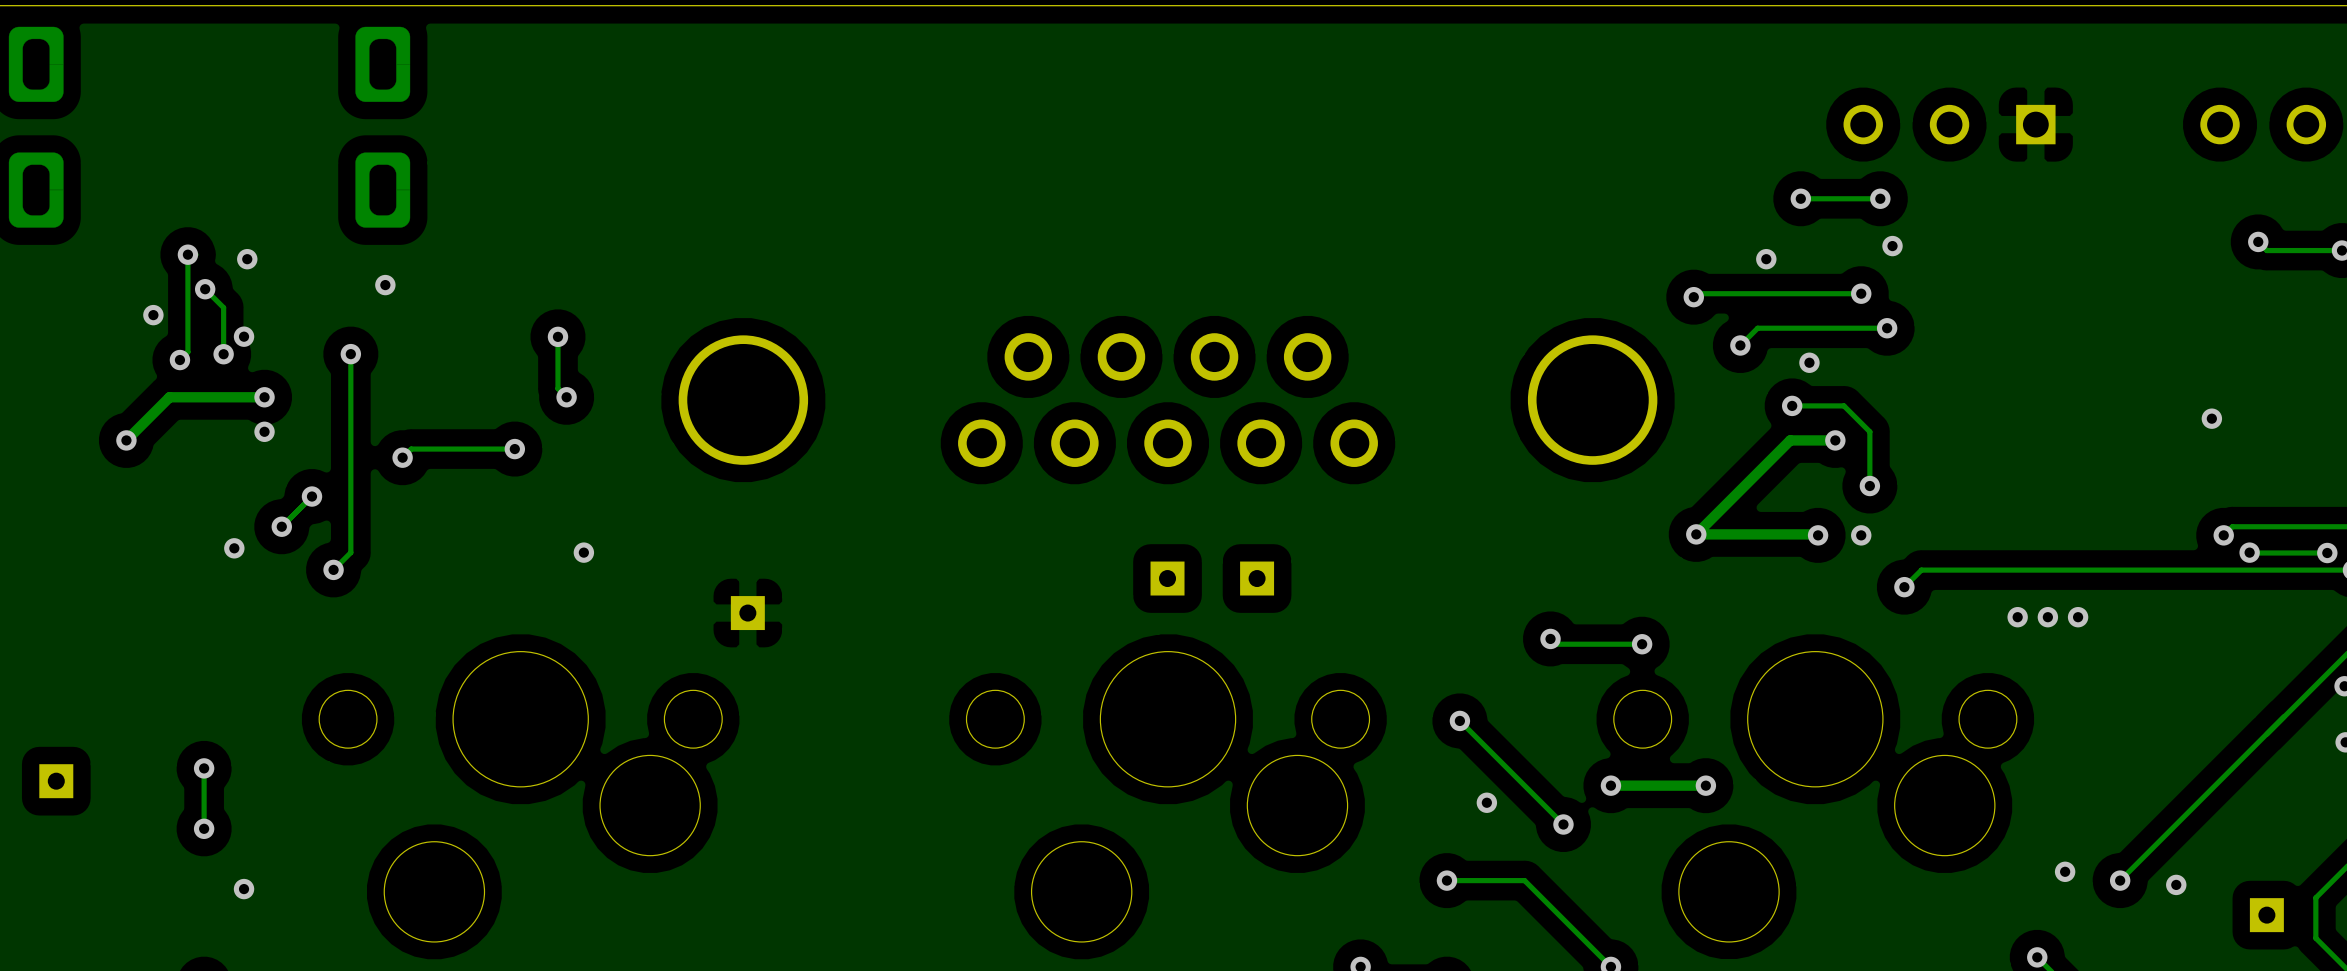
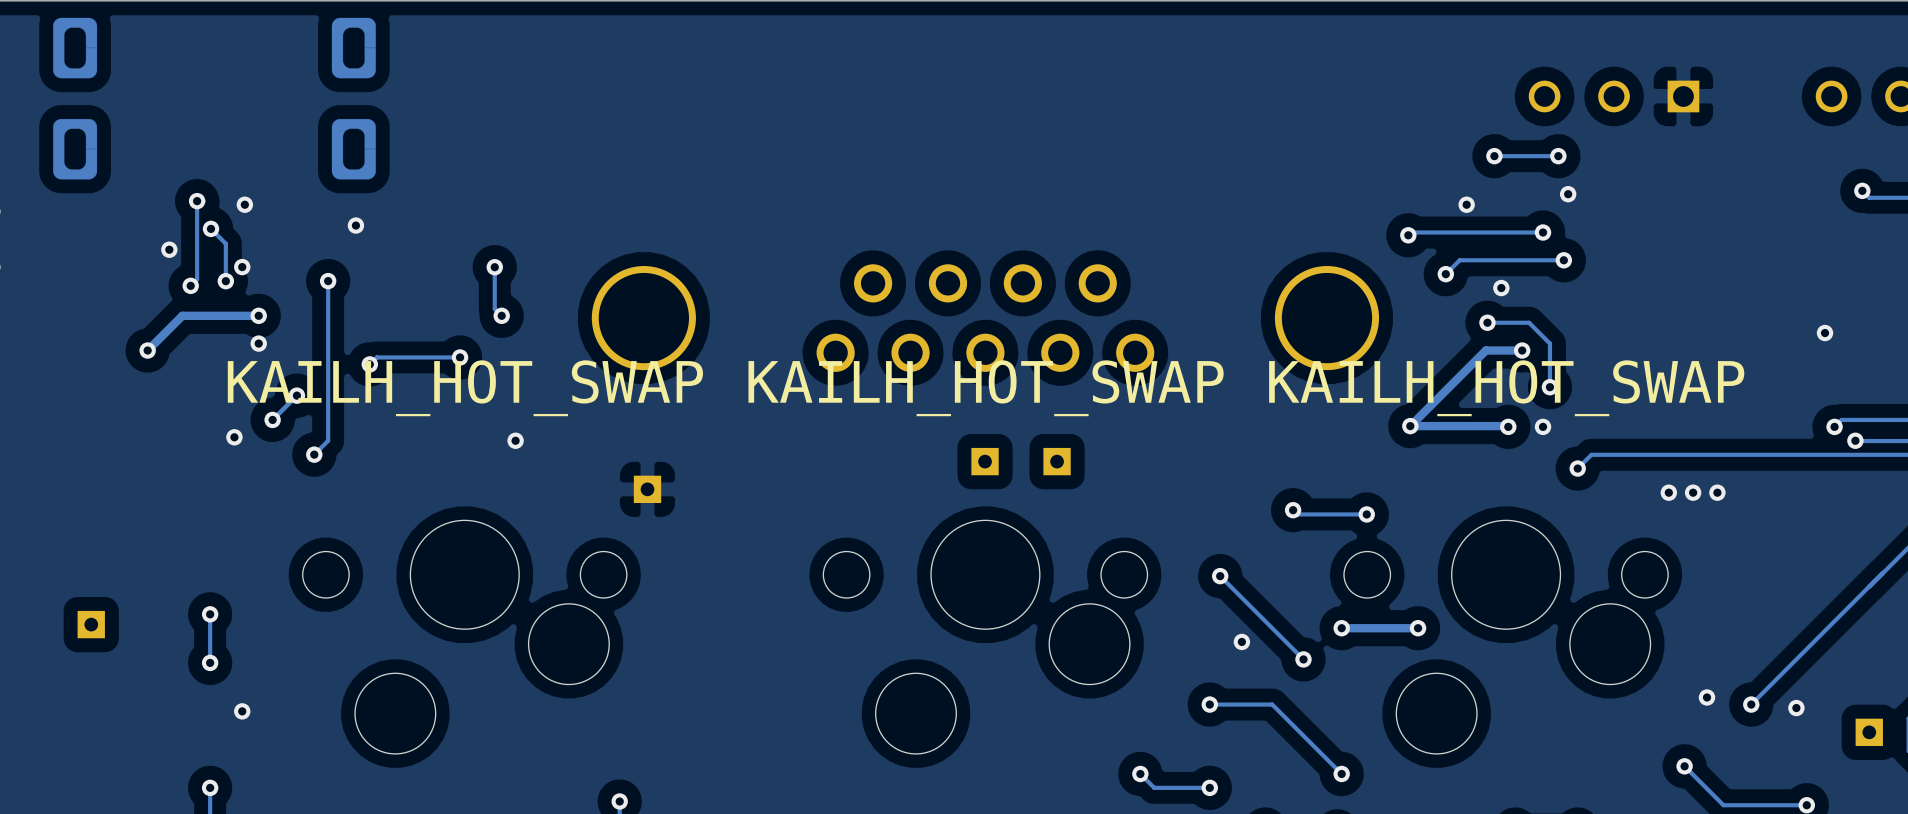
part value: none -> KAILH_HOT_SWAP (465, 388)
part value: none -> KAILH_HOT_SWAP (986, 388)
part value: none -> KAILH_HOT_SWAP (1506, 388)

